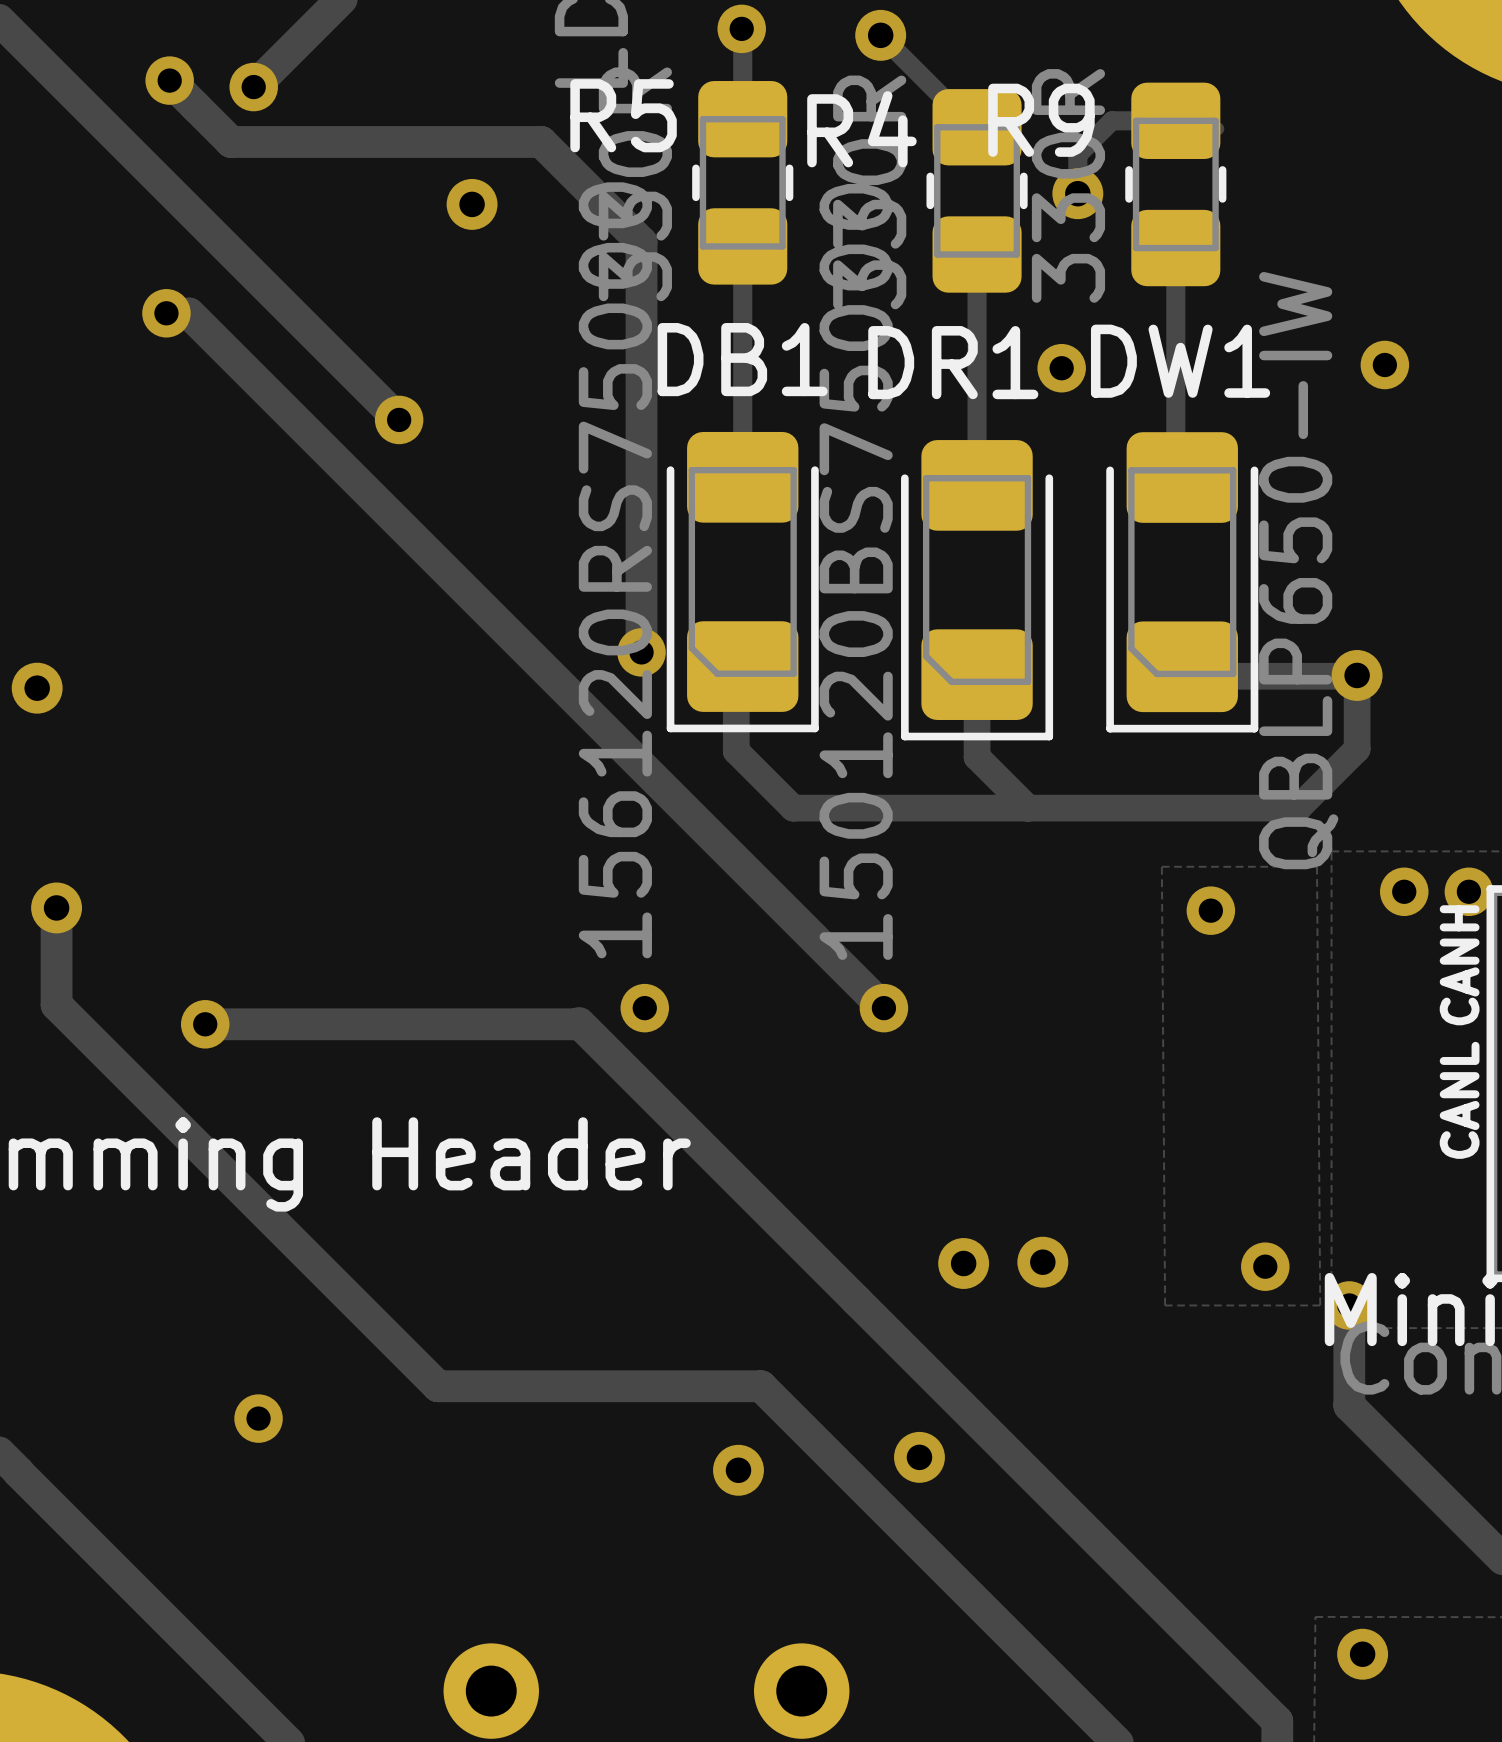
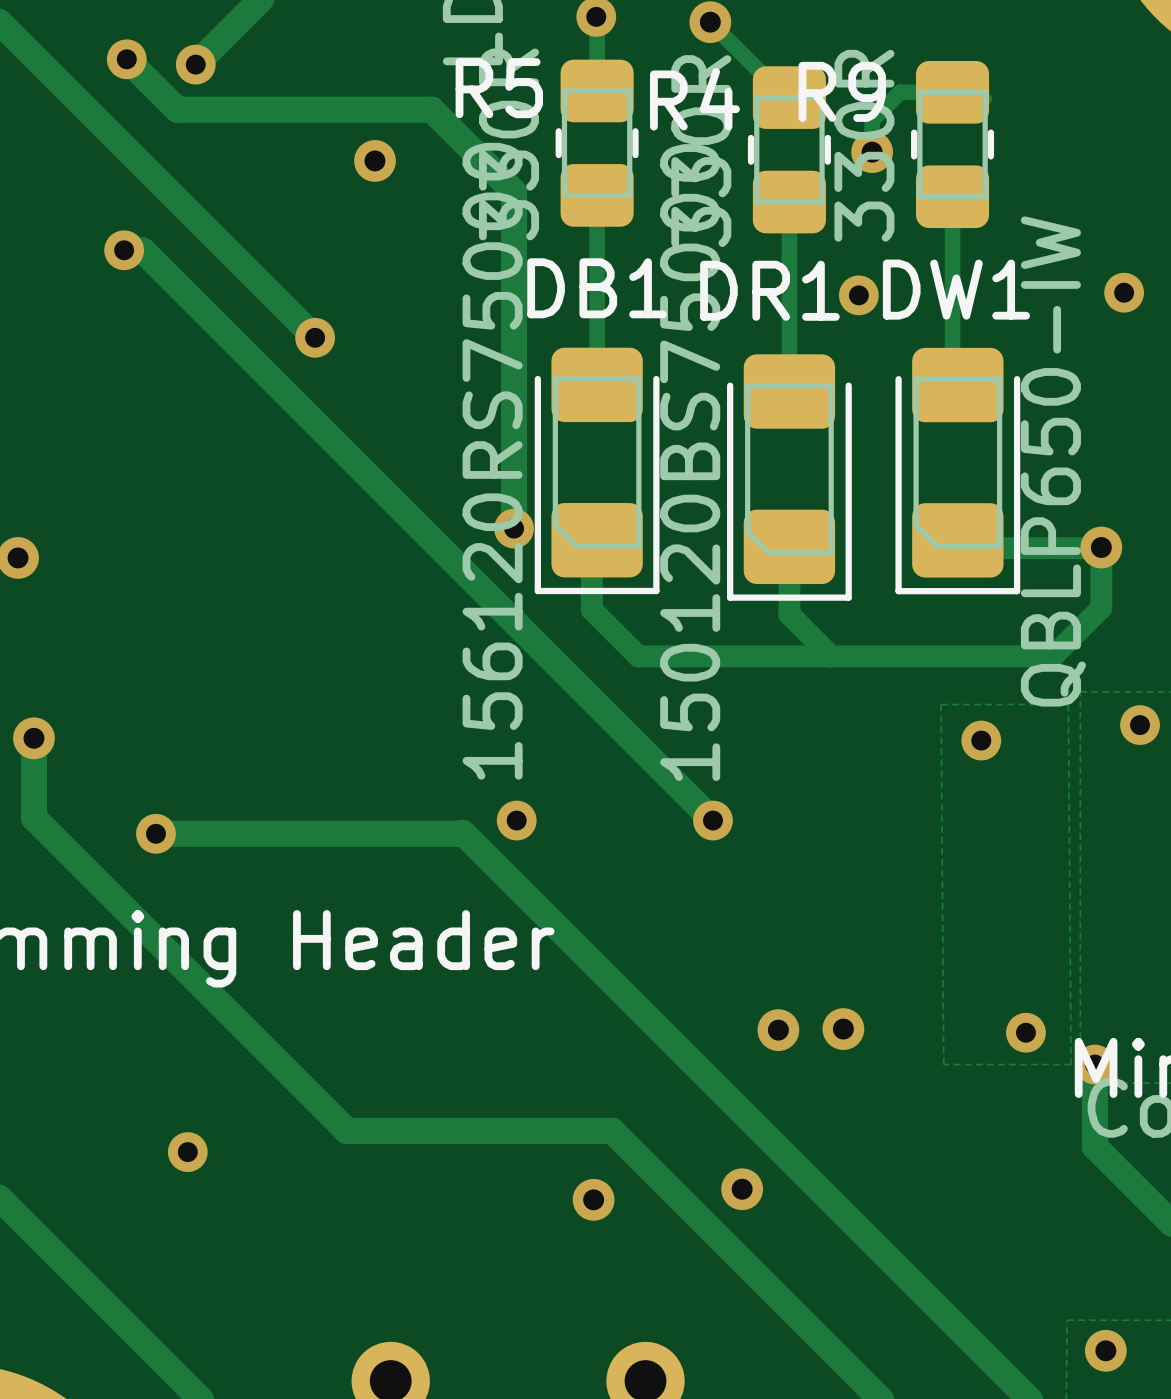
via position: (258, 1418) -> (187, 1152)

